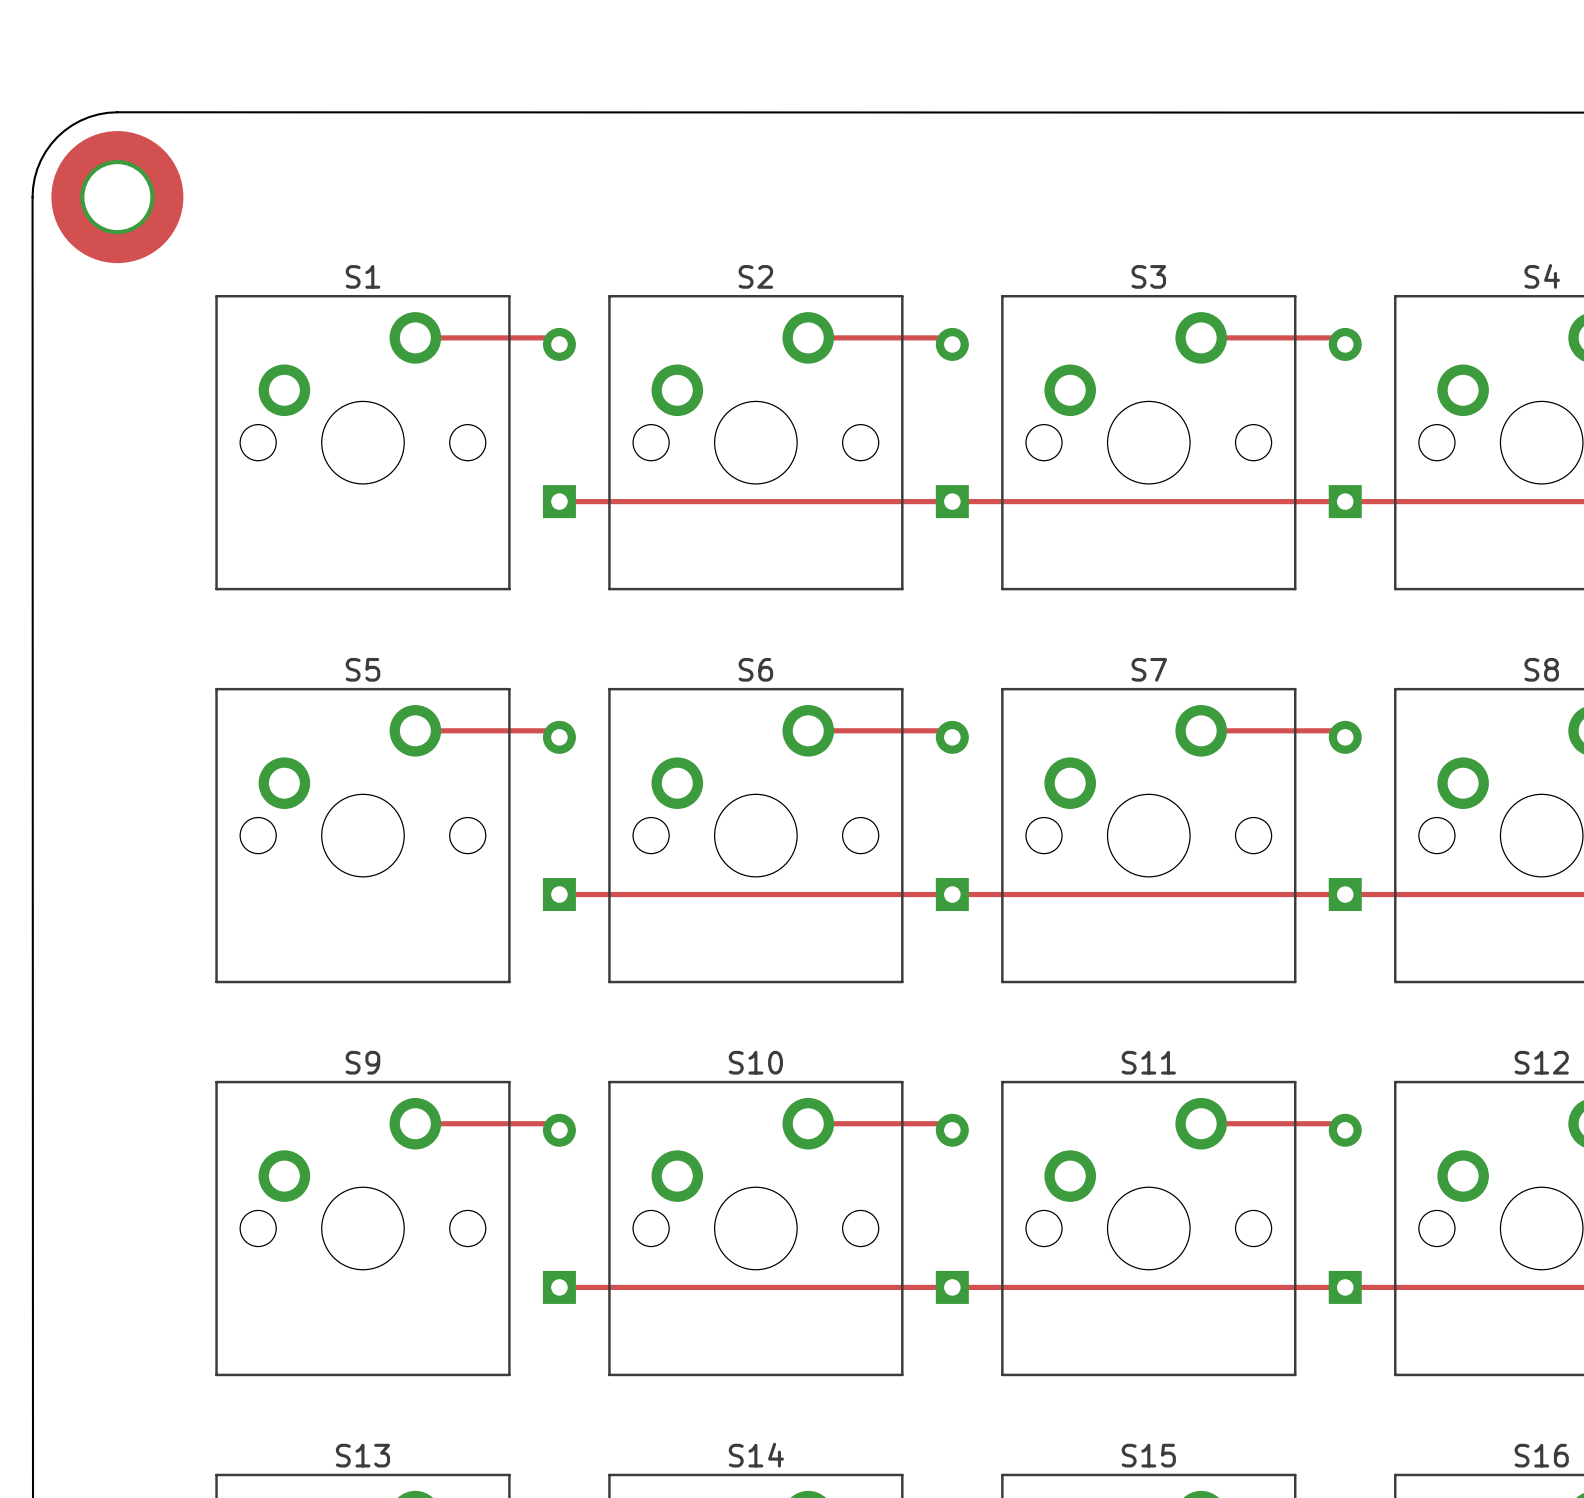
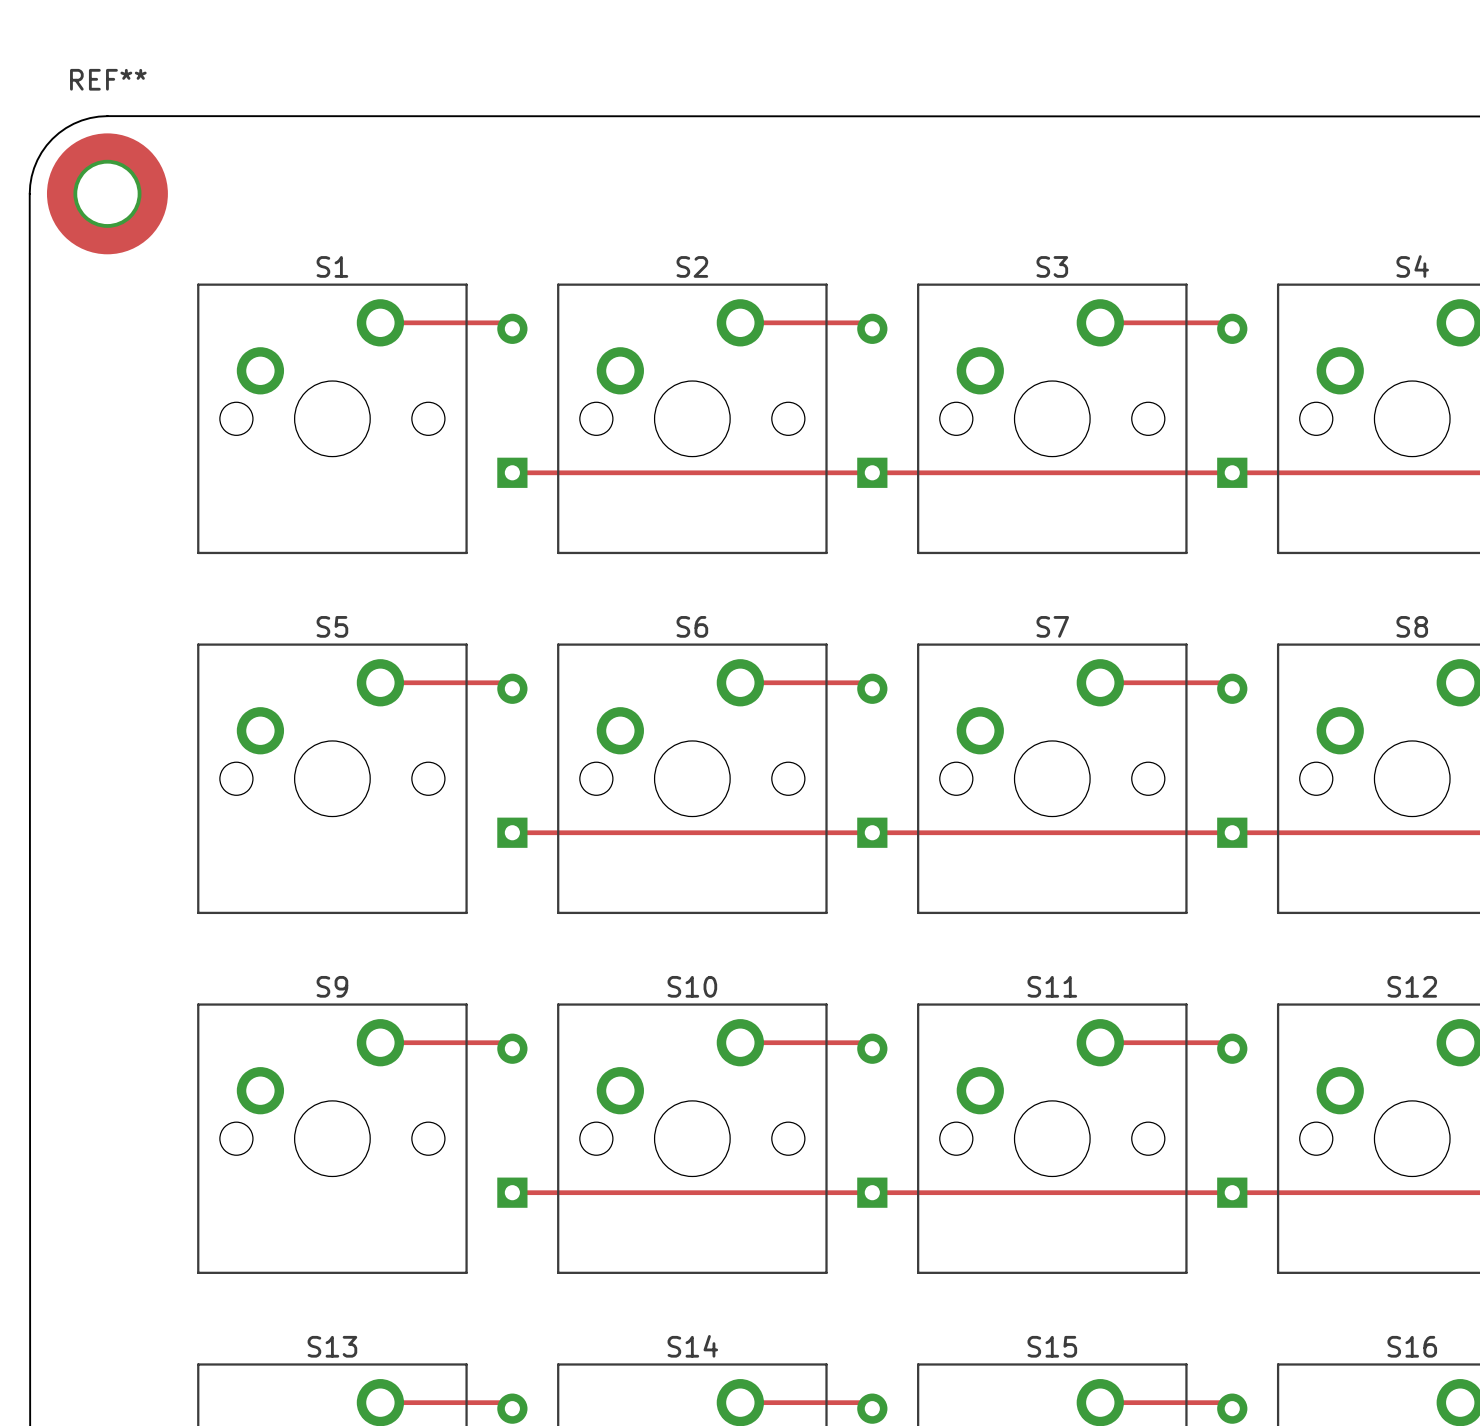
REF** name: none -> REF** (108, 79)

